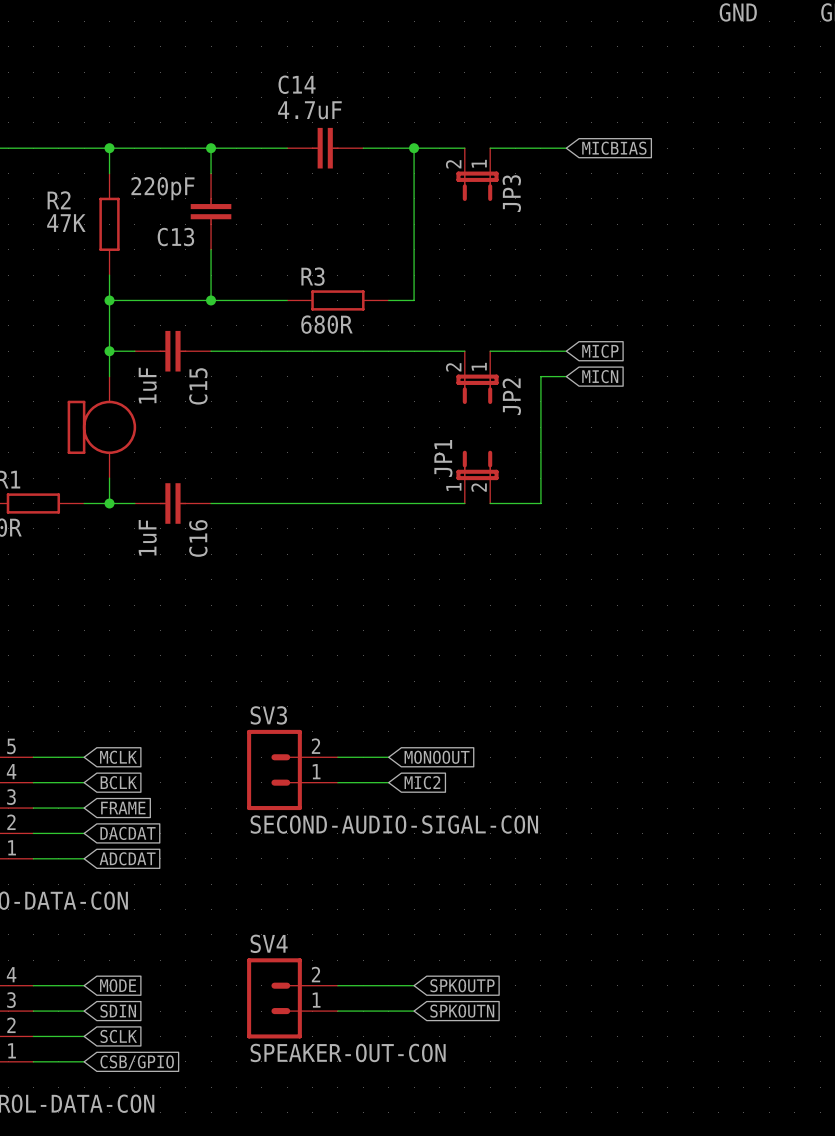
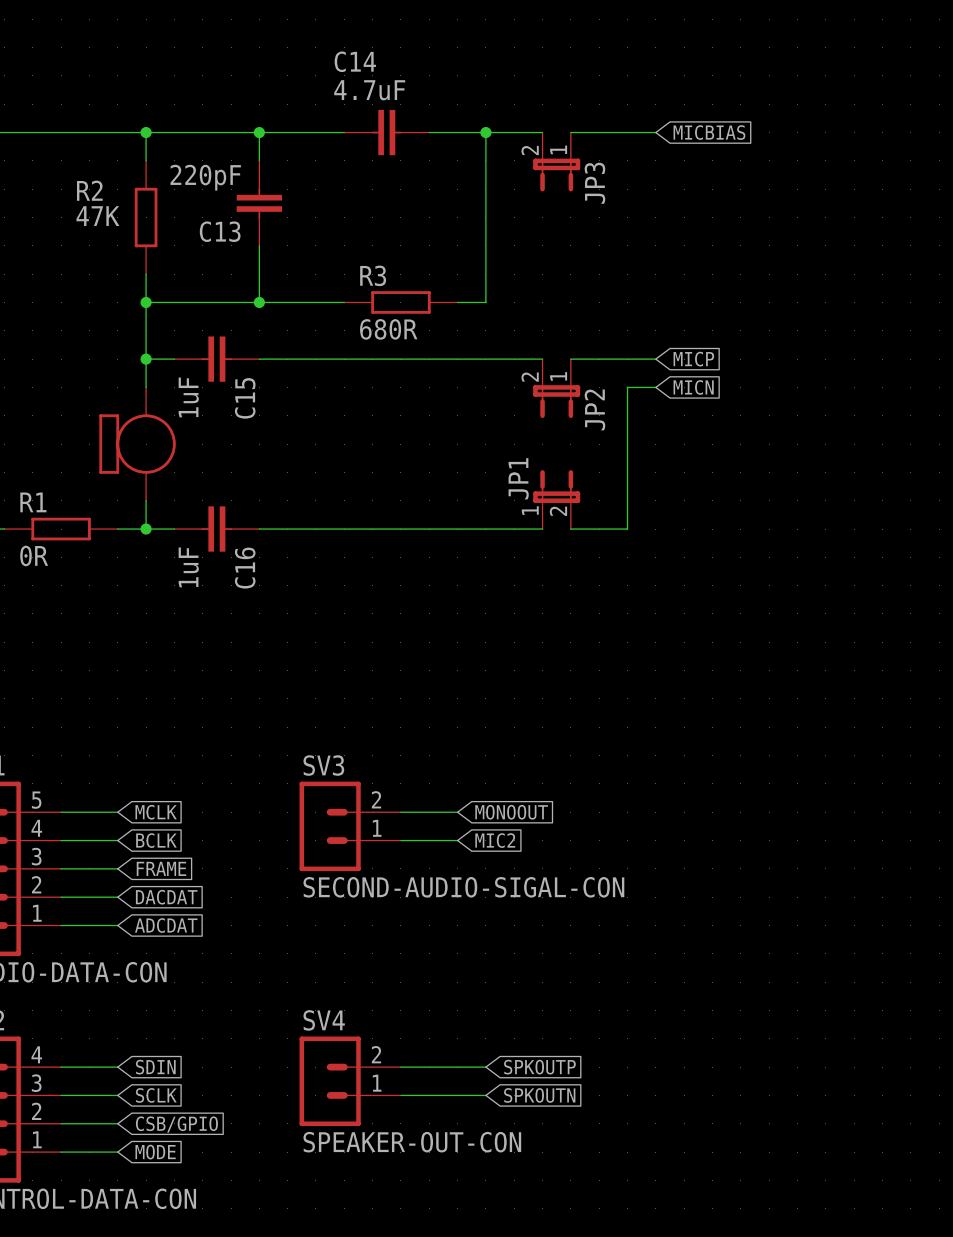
global label: MODE (118, 985) -> SDIN (155, 1067)
global label: SDIN (118, 1011) -> SCLK (156, 1095)
global label: SCLK (118, 1036) -> CSB/GPIO (176, 1124)
global label: CSB/GPIO (137, 1062) -> MODE (155, 1152)

